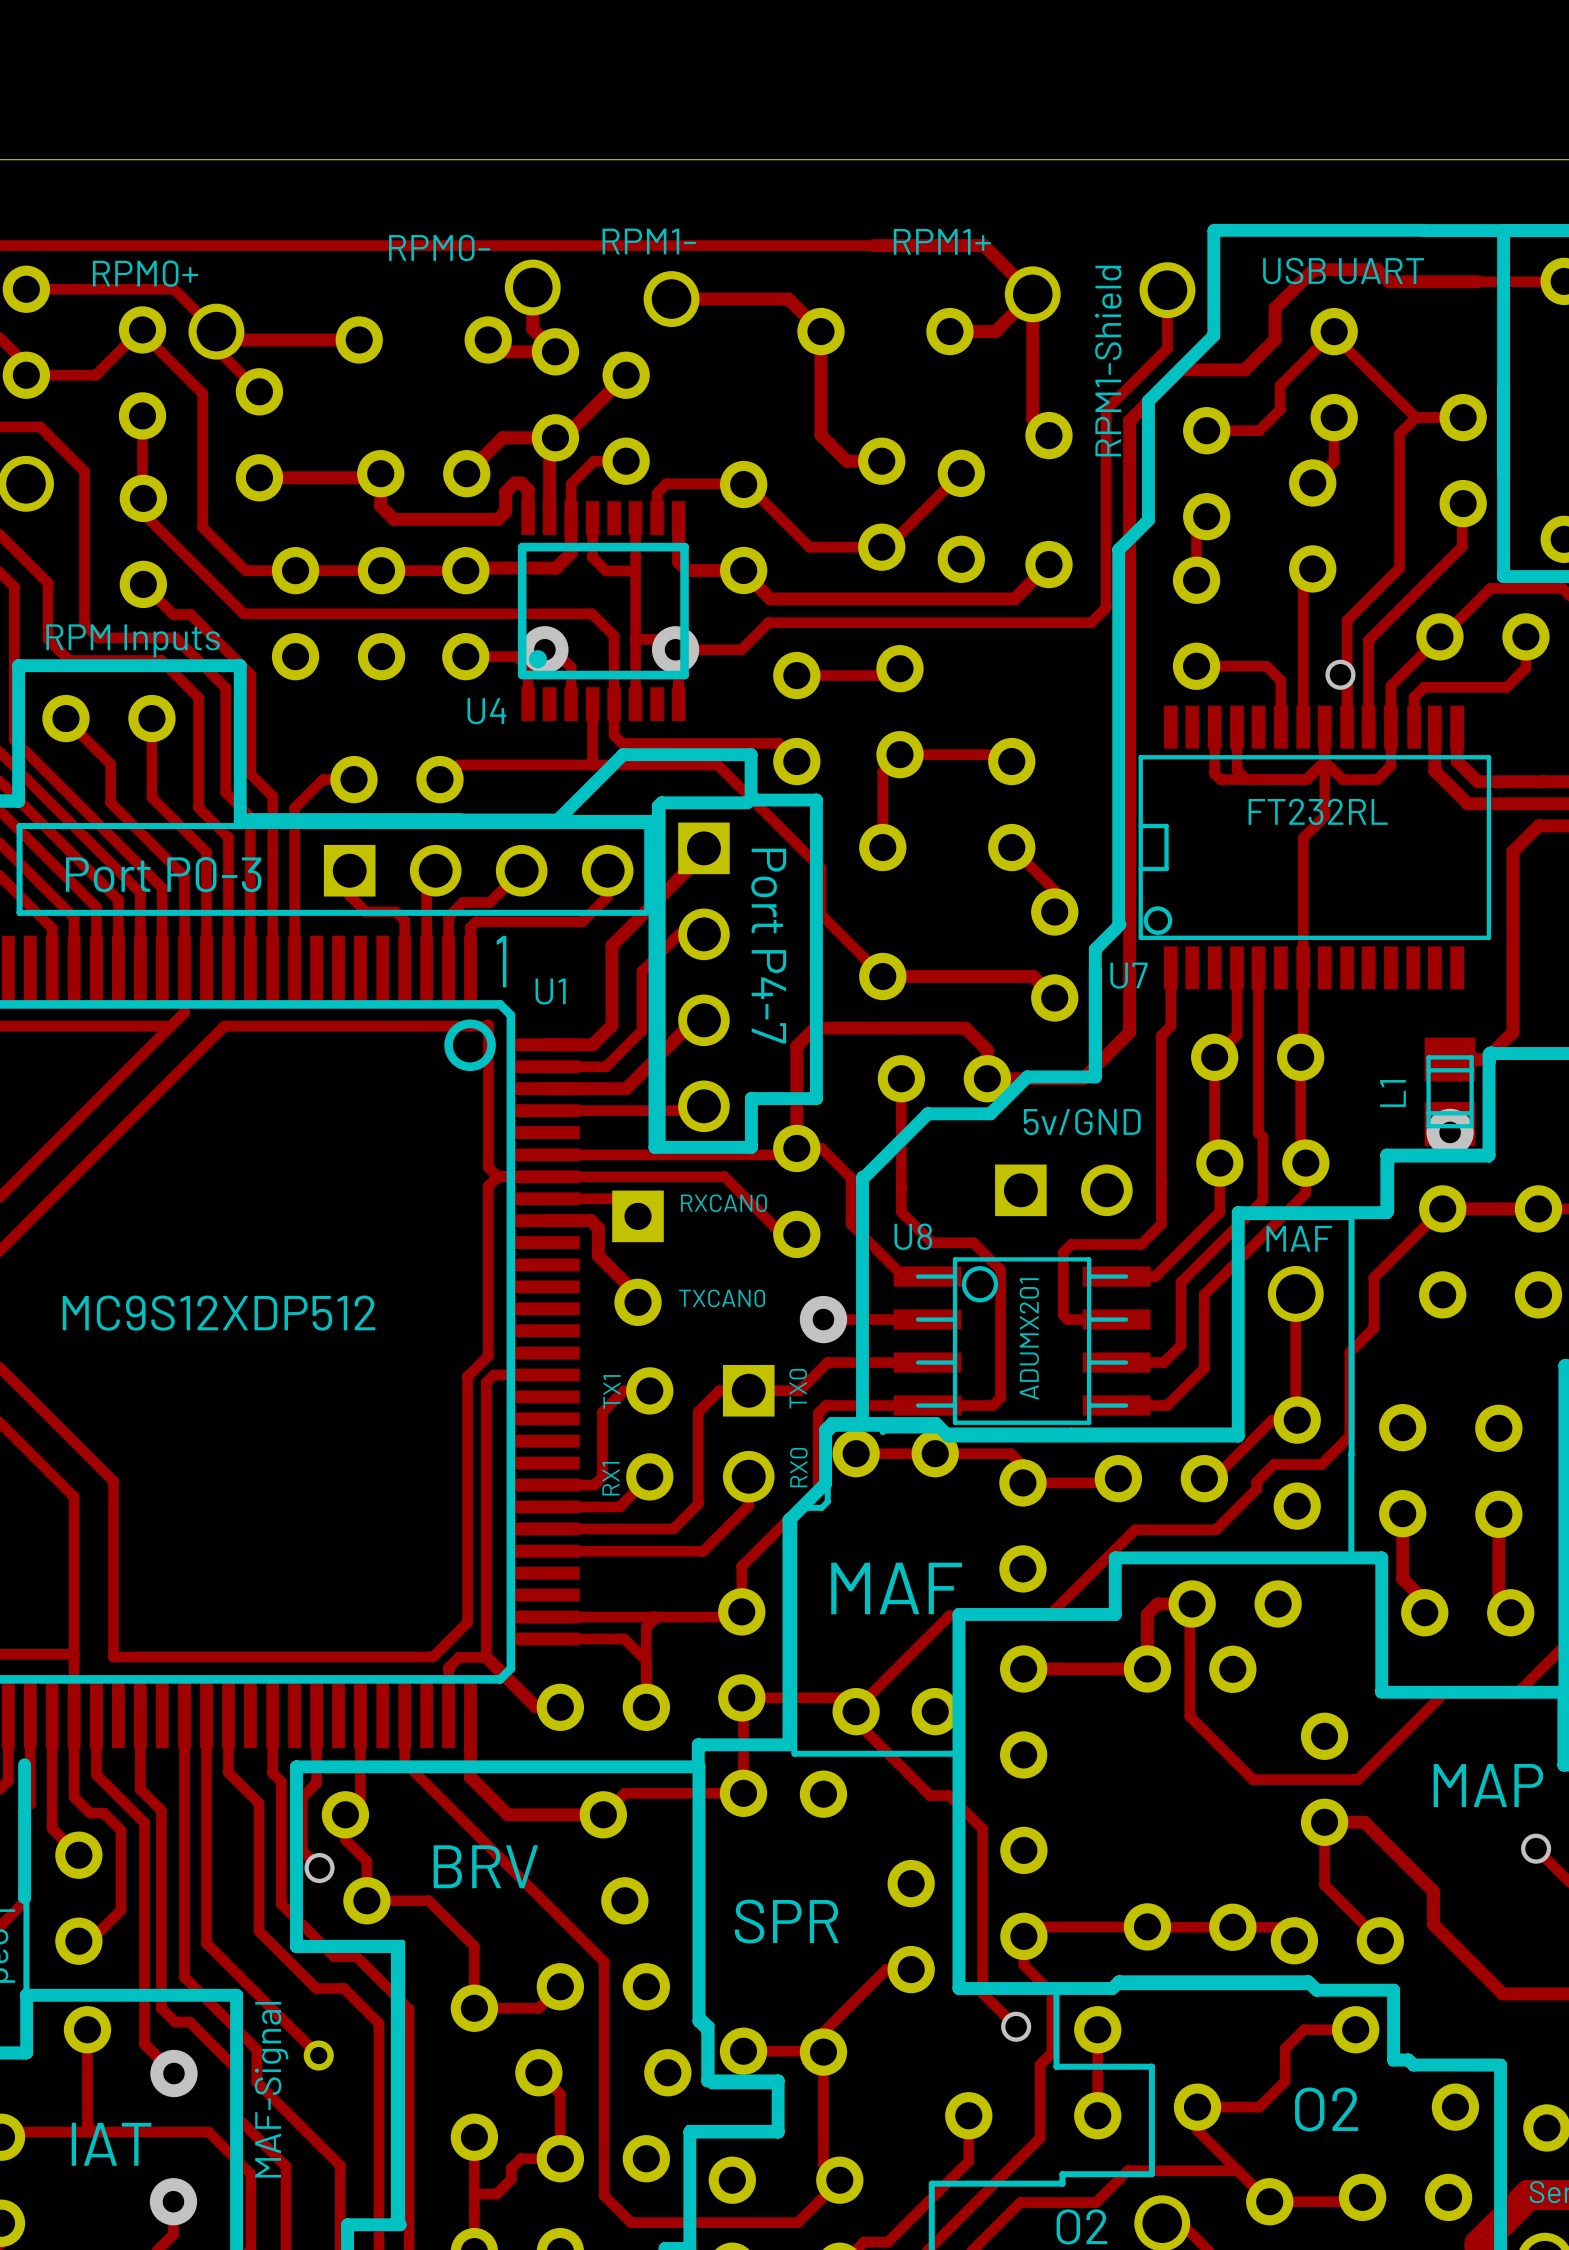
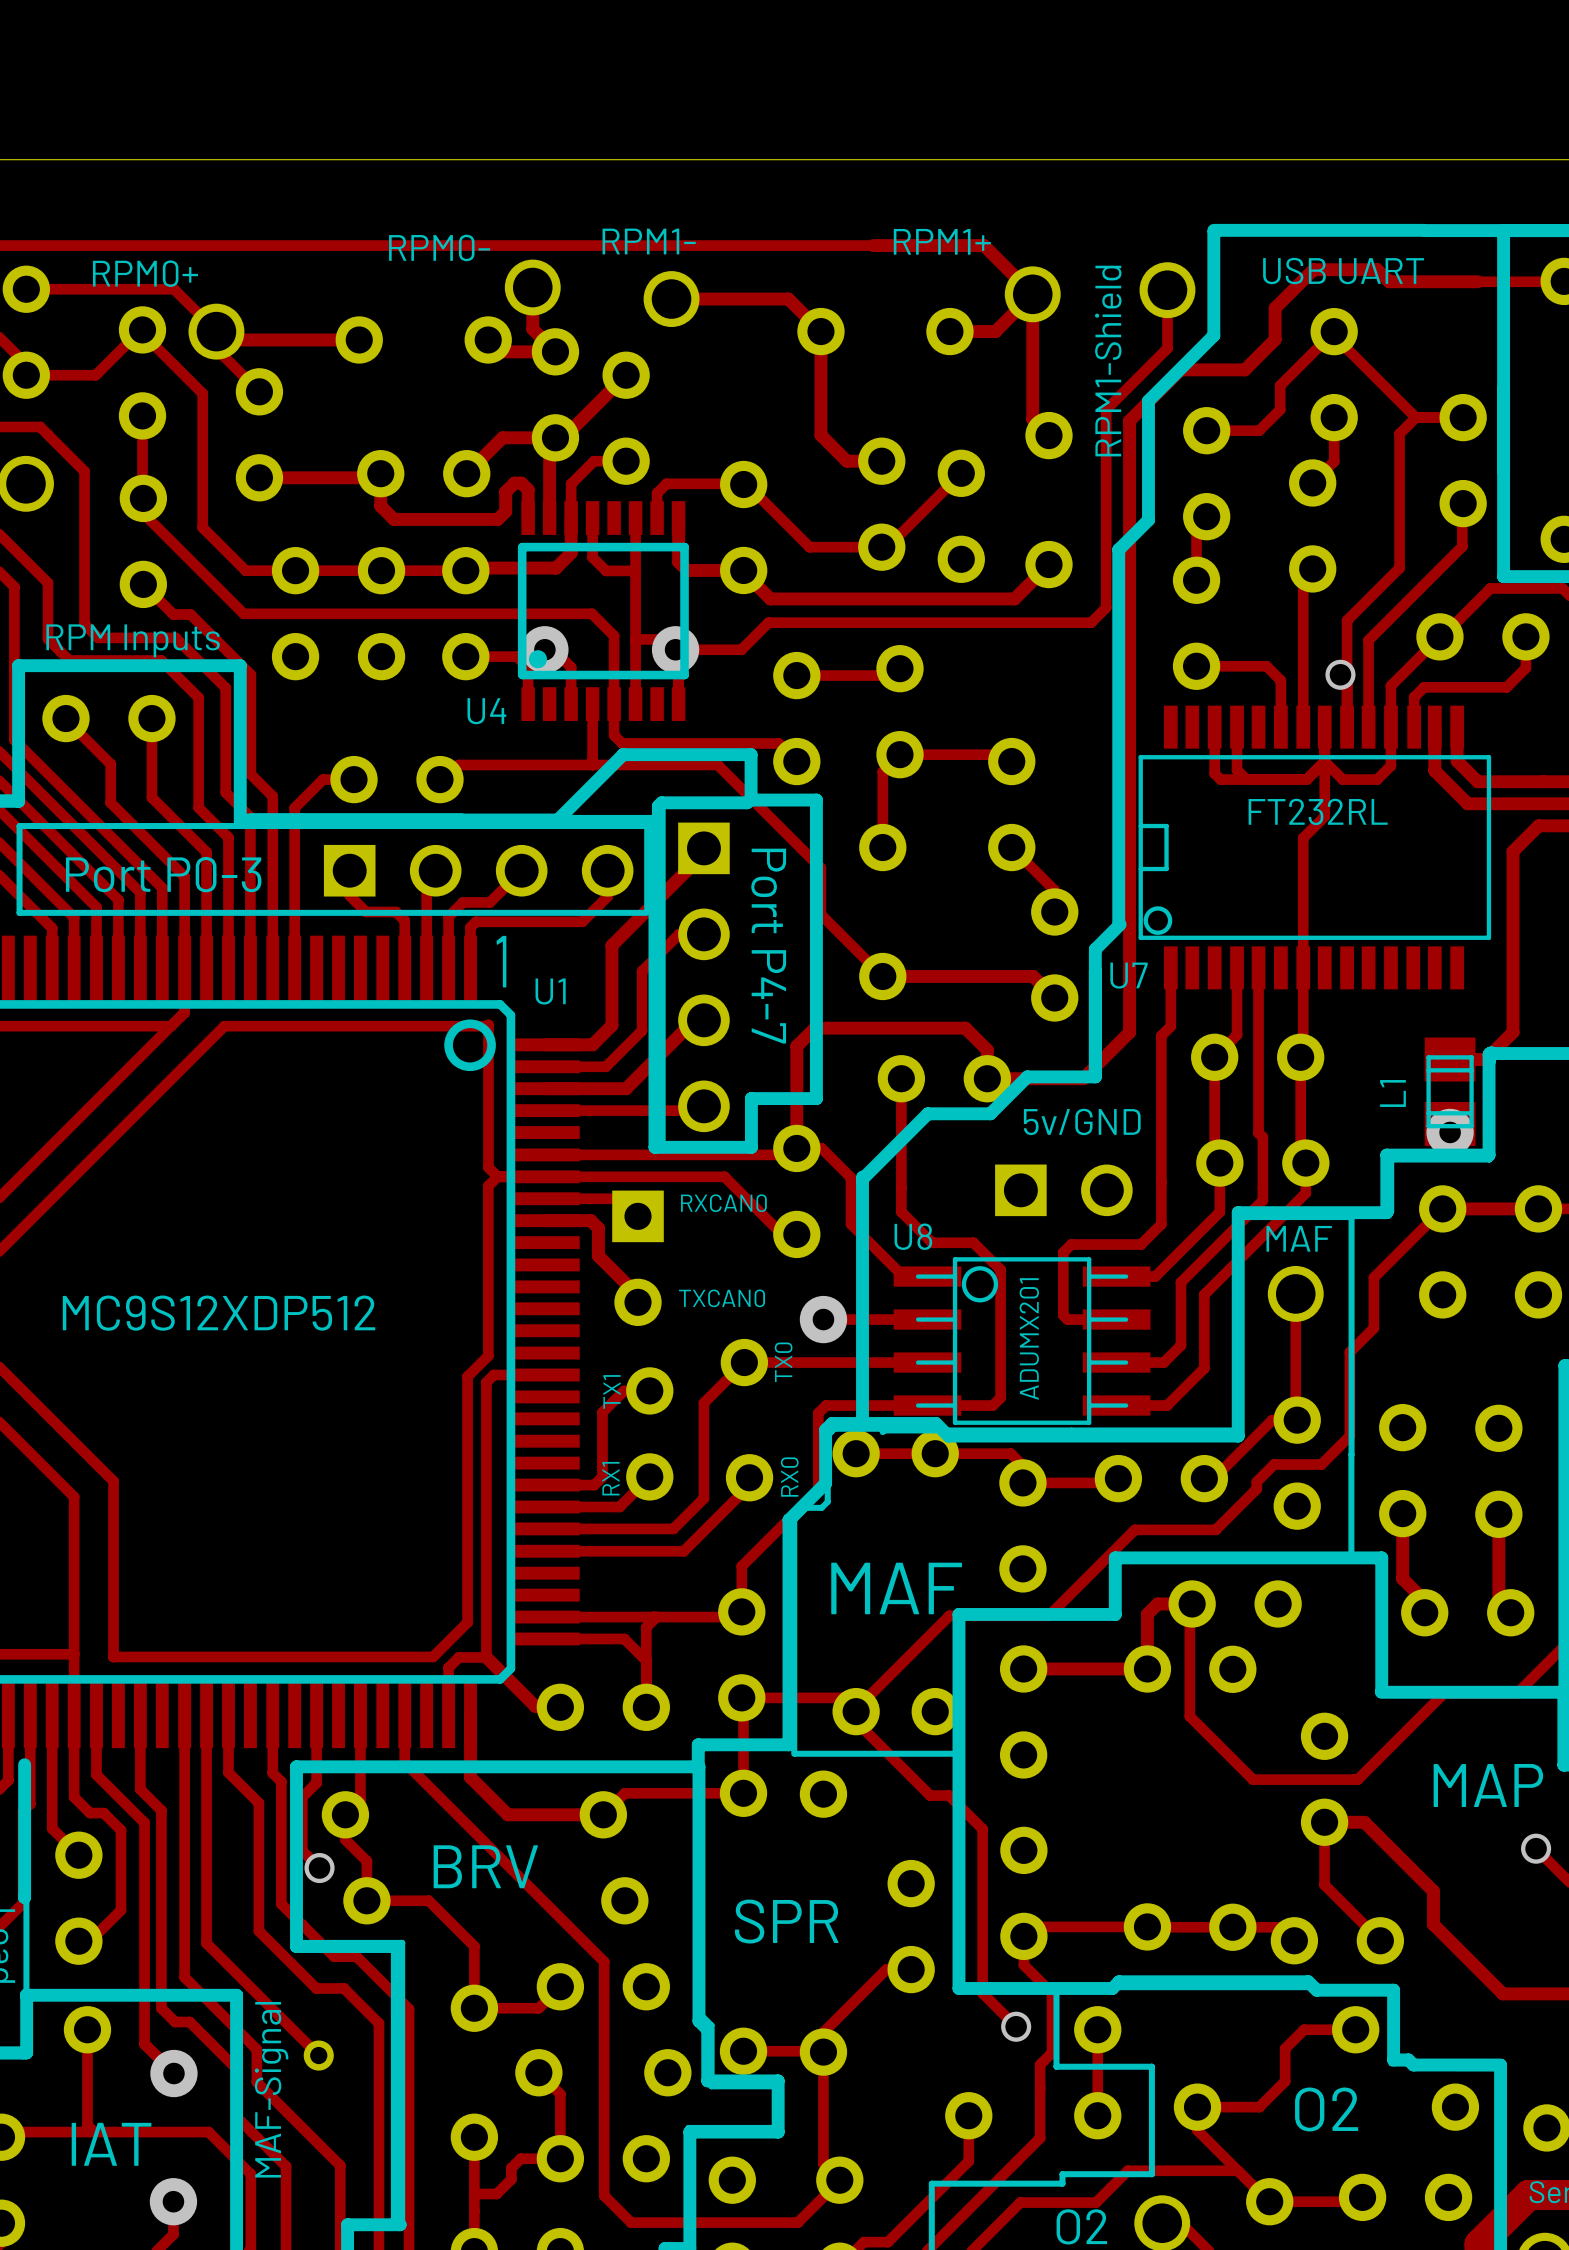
part: none -> (744, 1362)
track: (827, 1362) (799, 1390) (719, 1390) (698, 1411) (698, 1504) -> (827, 1362) (744, 1362) (703, 1402) (703, 1498) (698, 1504)
text position: TX0 (798, 1388) -> TX0 (783, 1362)
part: (748, 1433) -> none
text position: RX0 (798, 1467) -> RX0 (789, 1477)
track: (748, 1476) (748, 1505) (703, 1551) (683, 1551) -> (749, 1477) (749, 1485) (683, 1551)
part: none -> (749, 1477)

